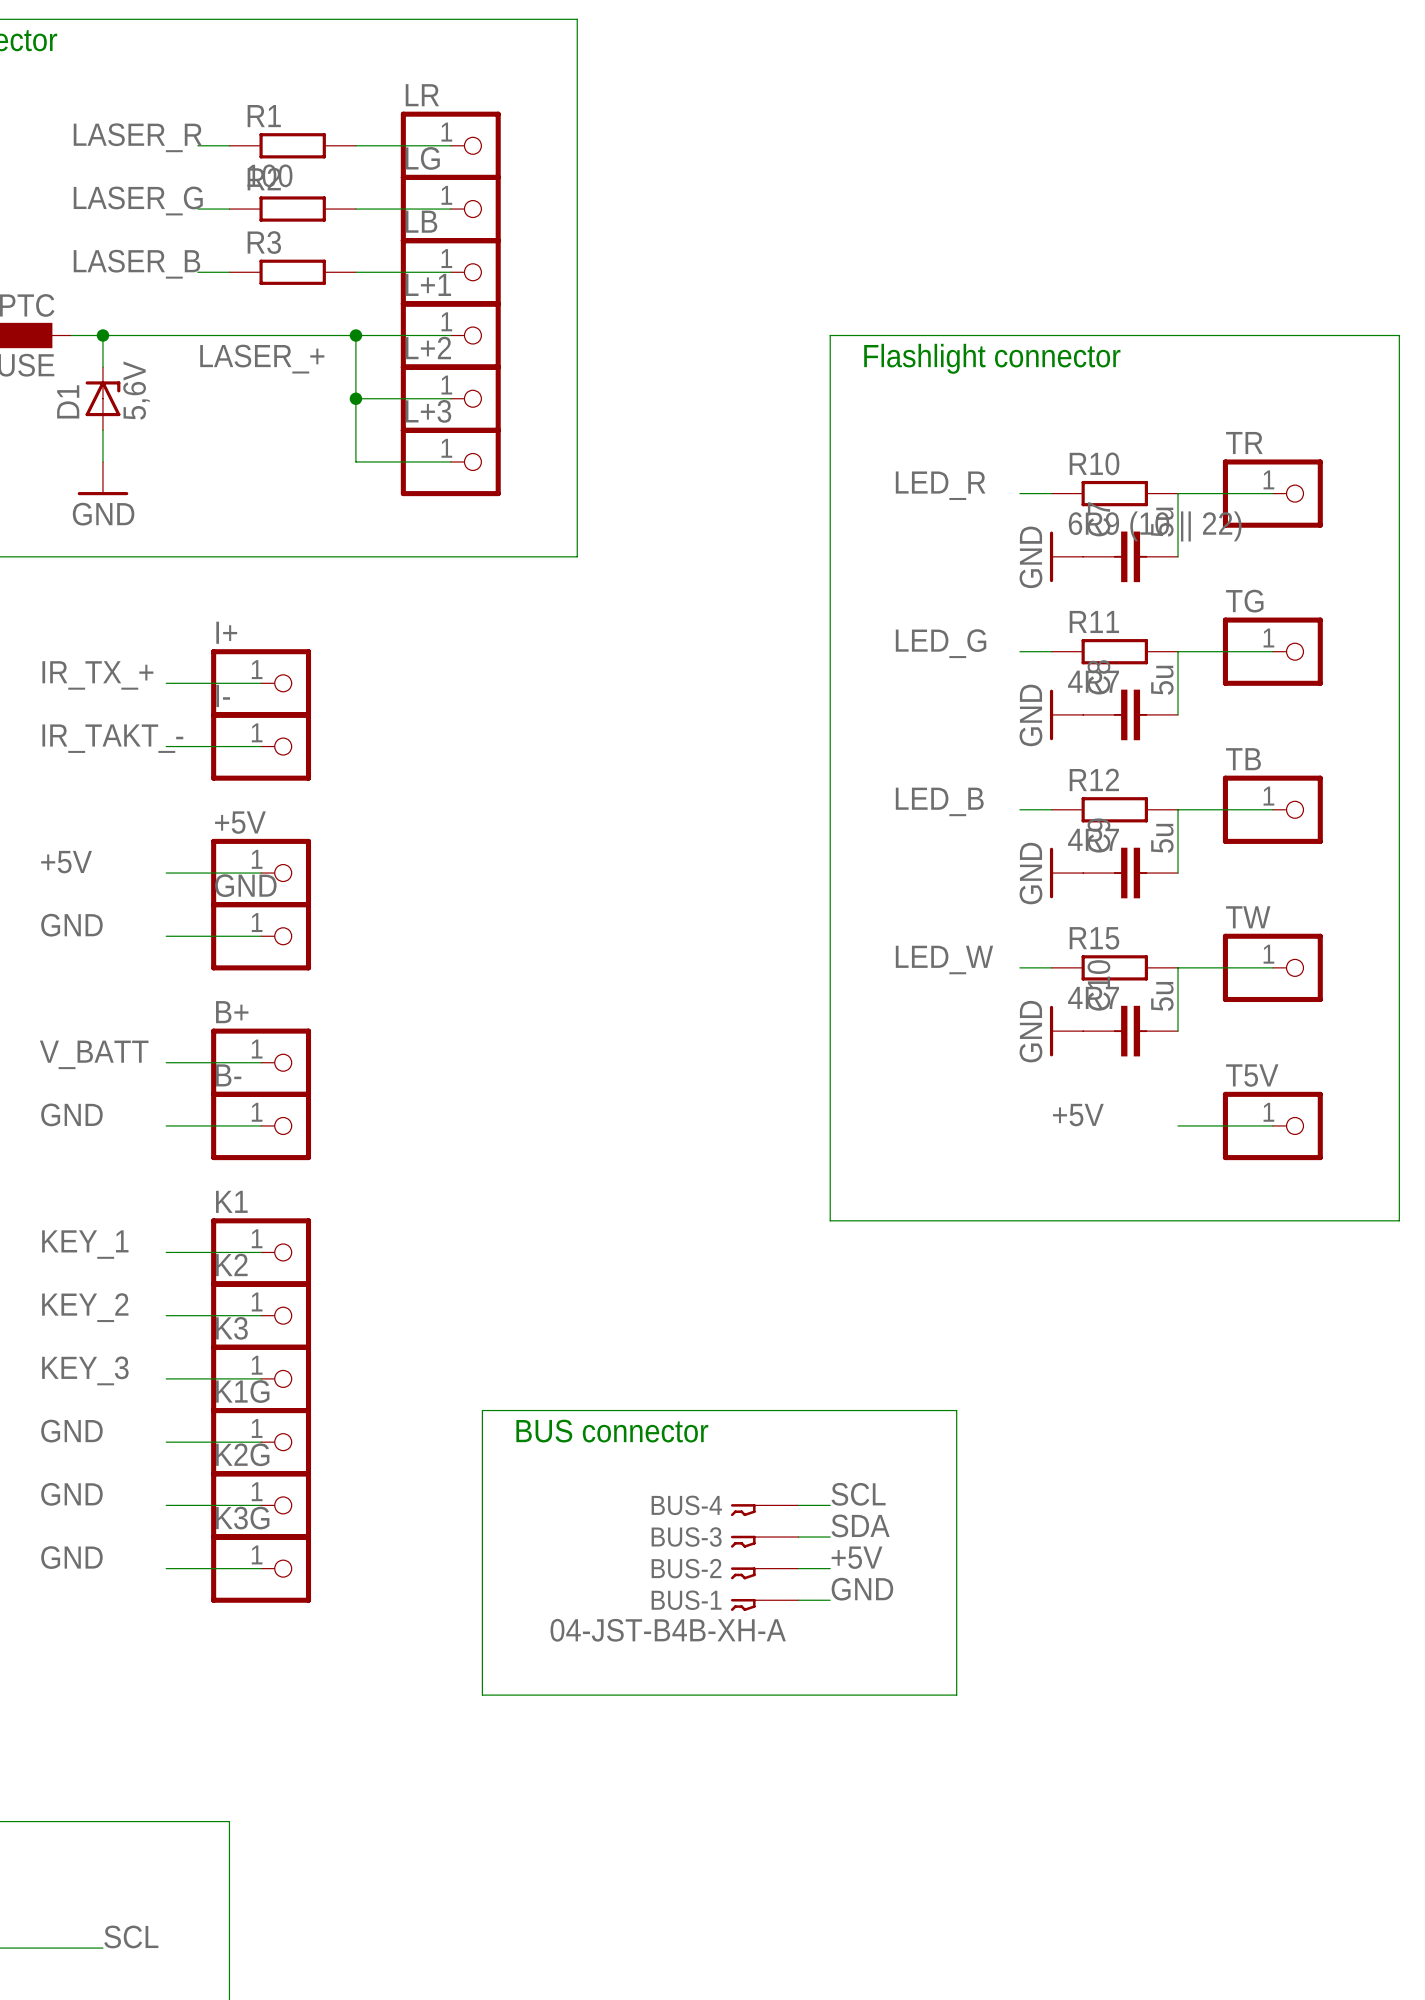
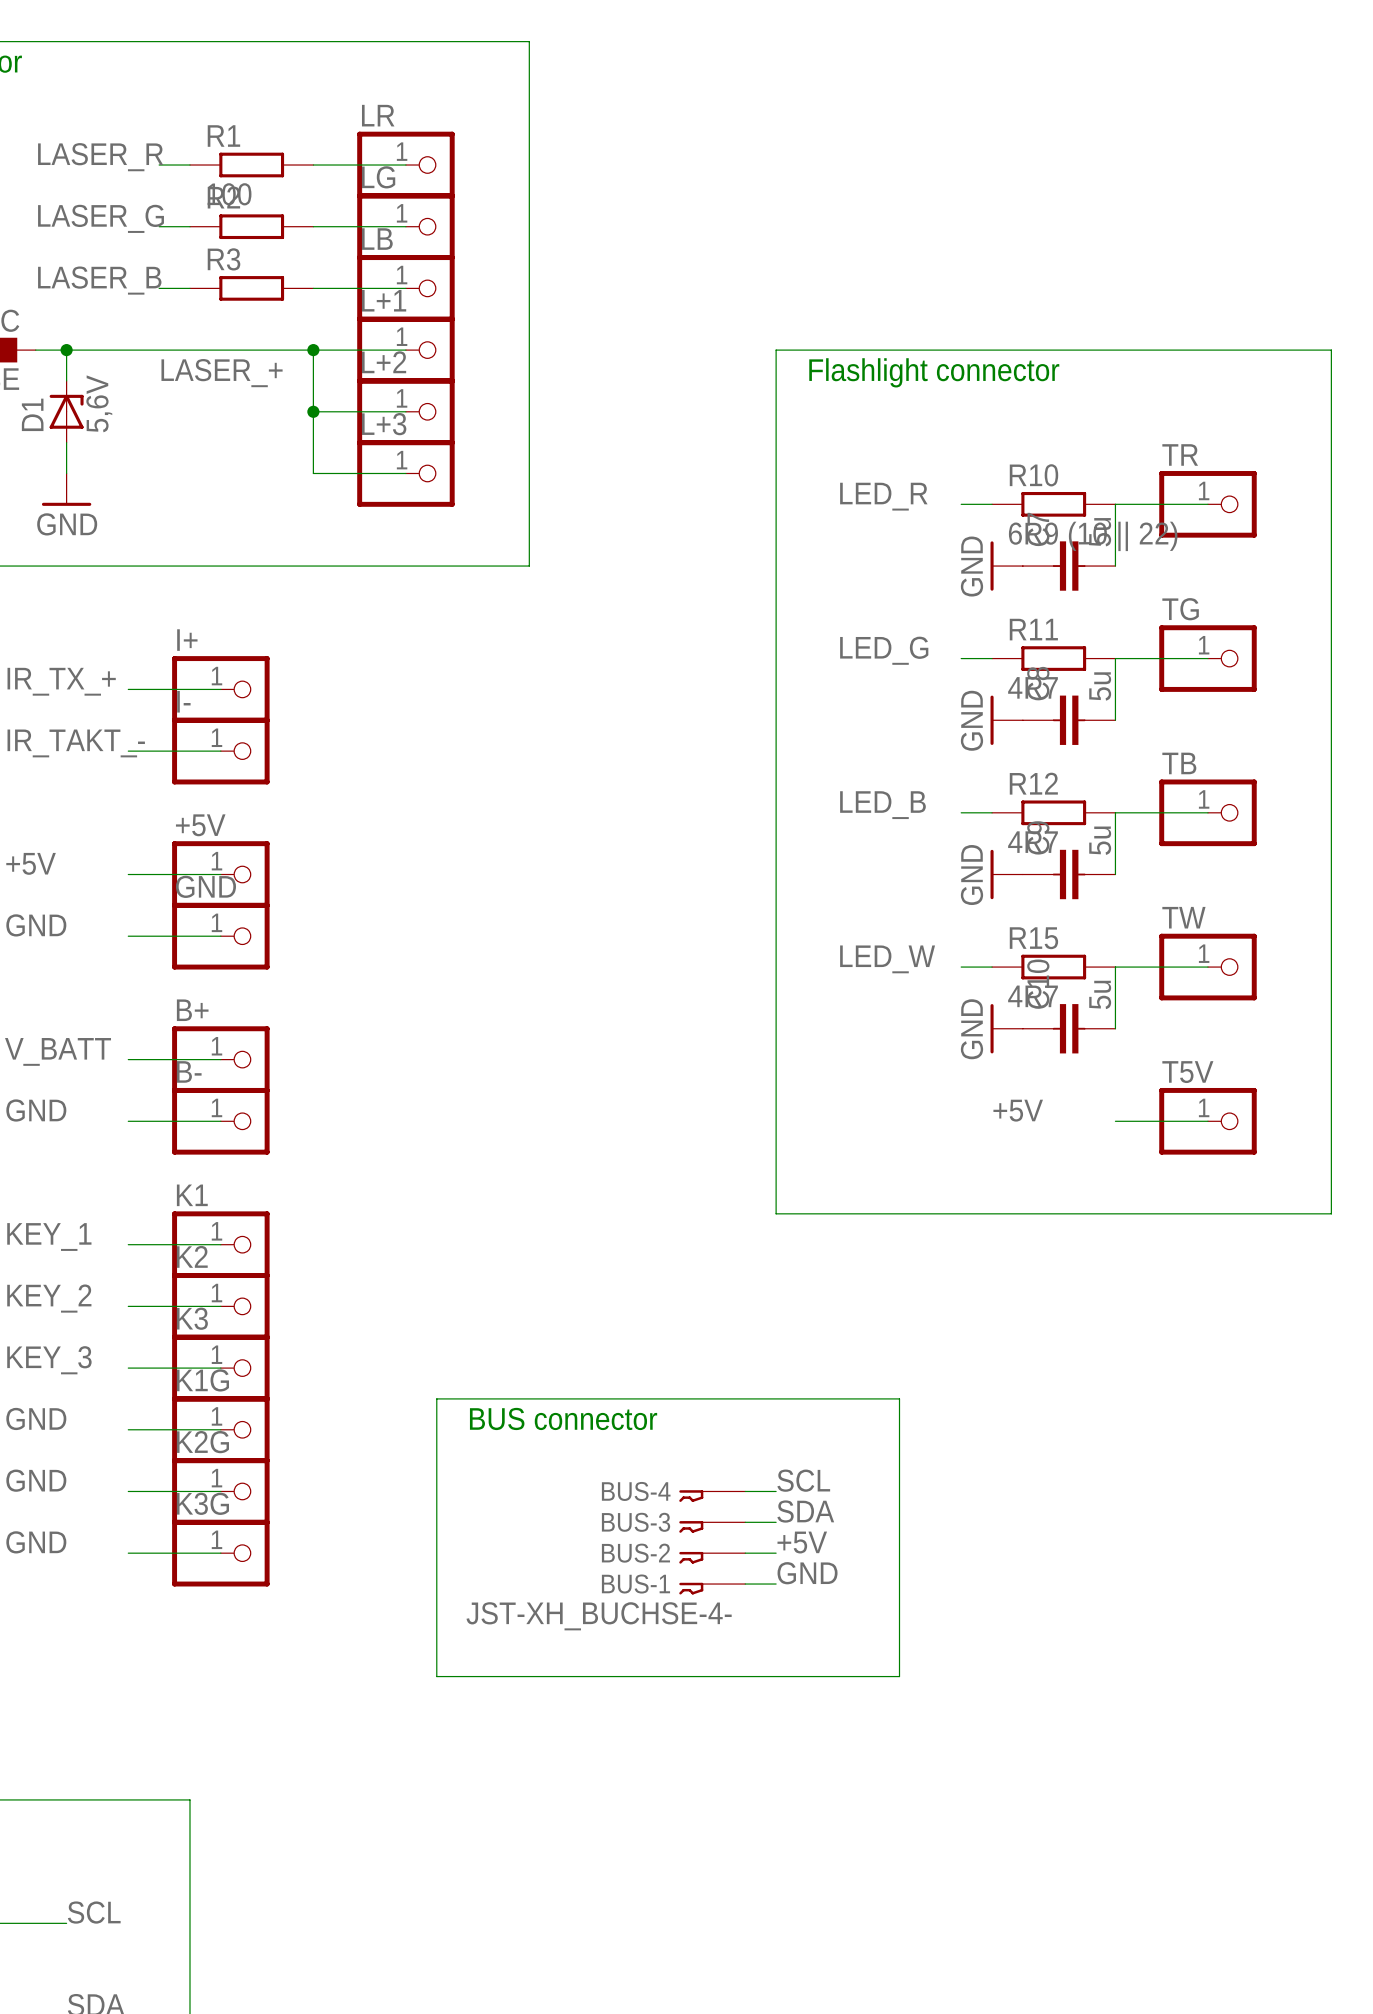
BUS-1 value: 04-JST-B4B-XH-A (668, 1630) -> JST-XH_BUCHSE-4- (599, 1616)

